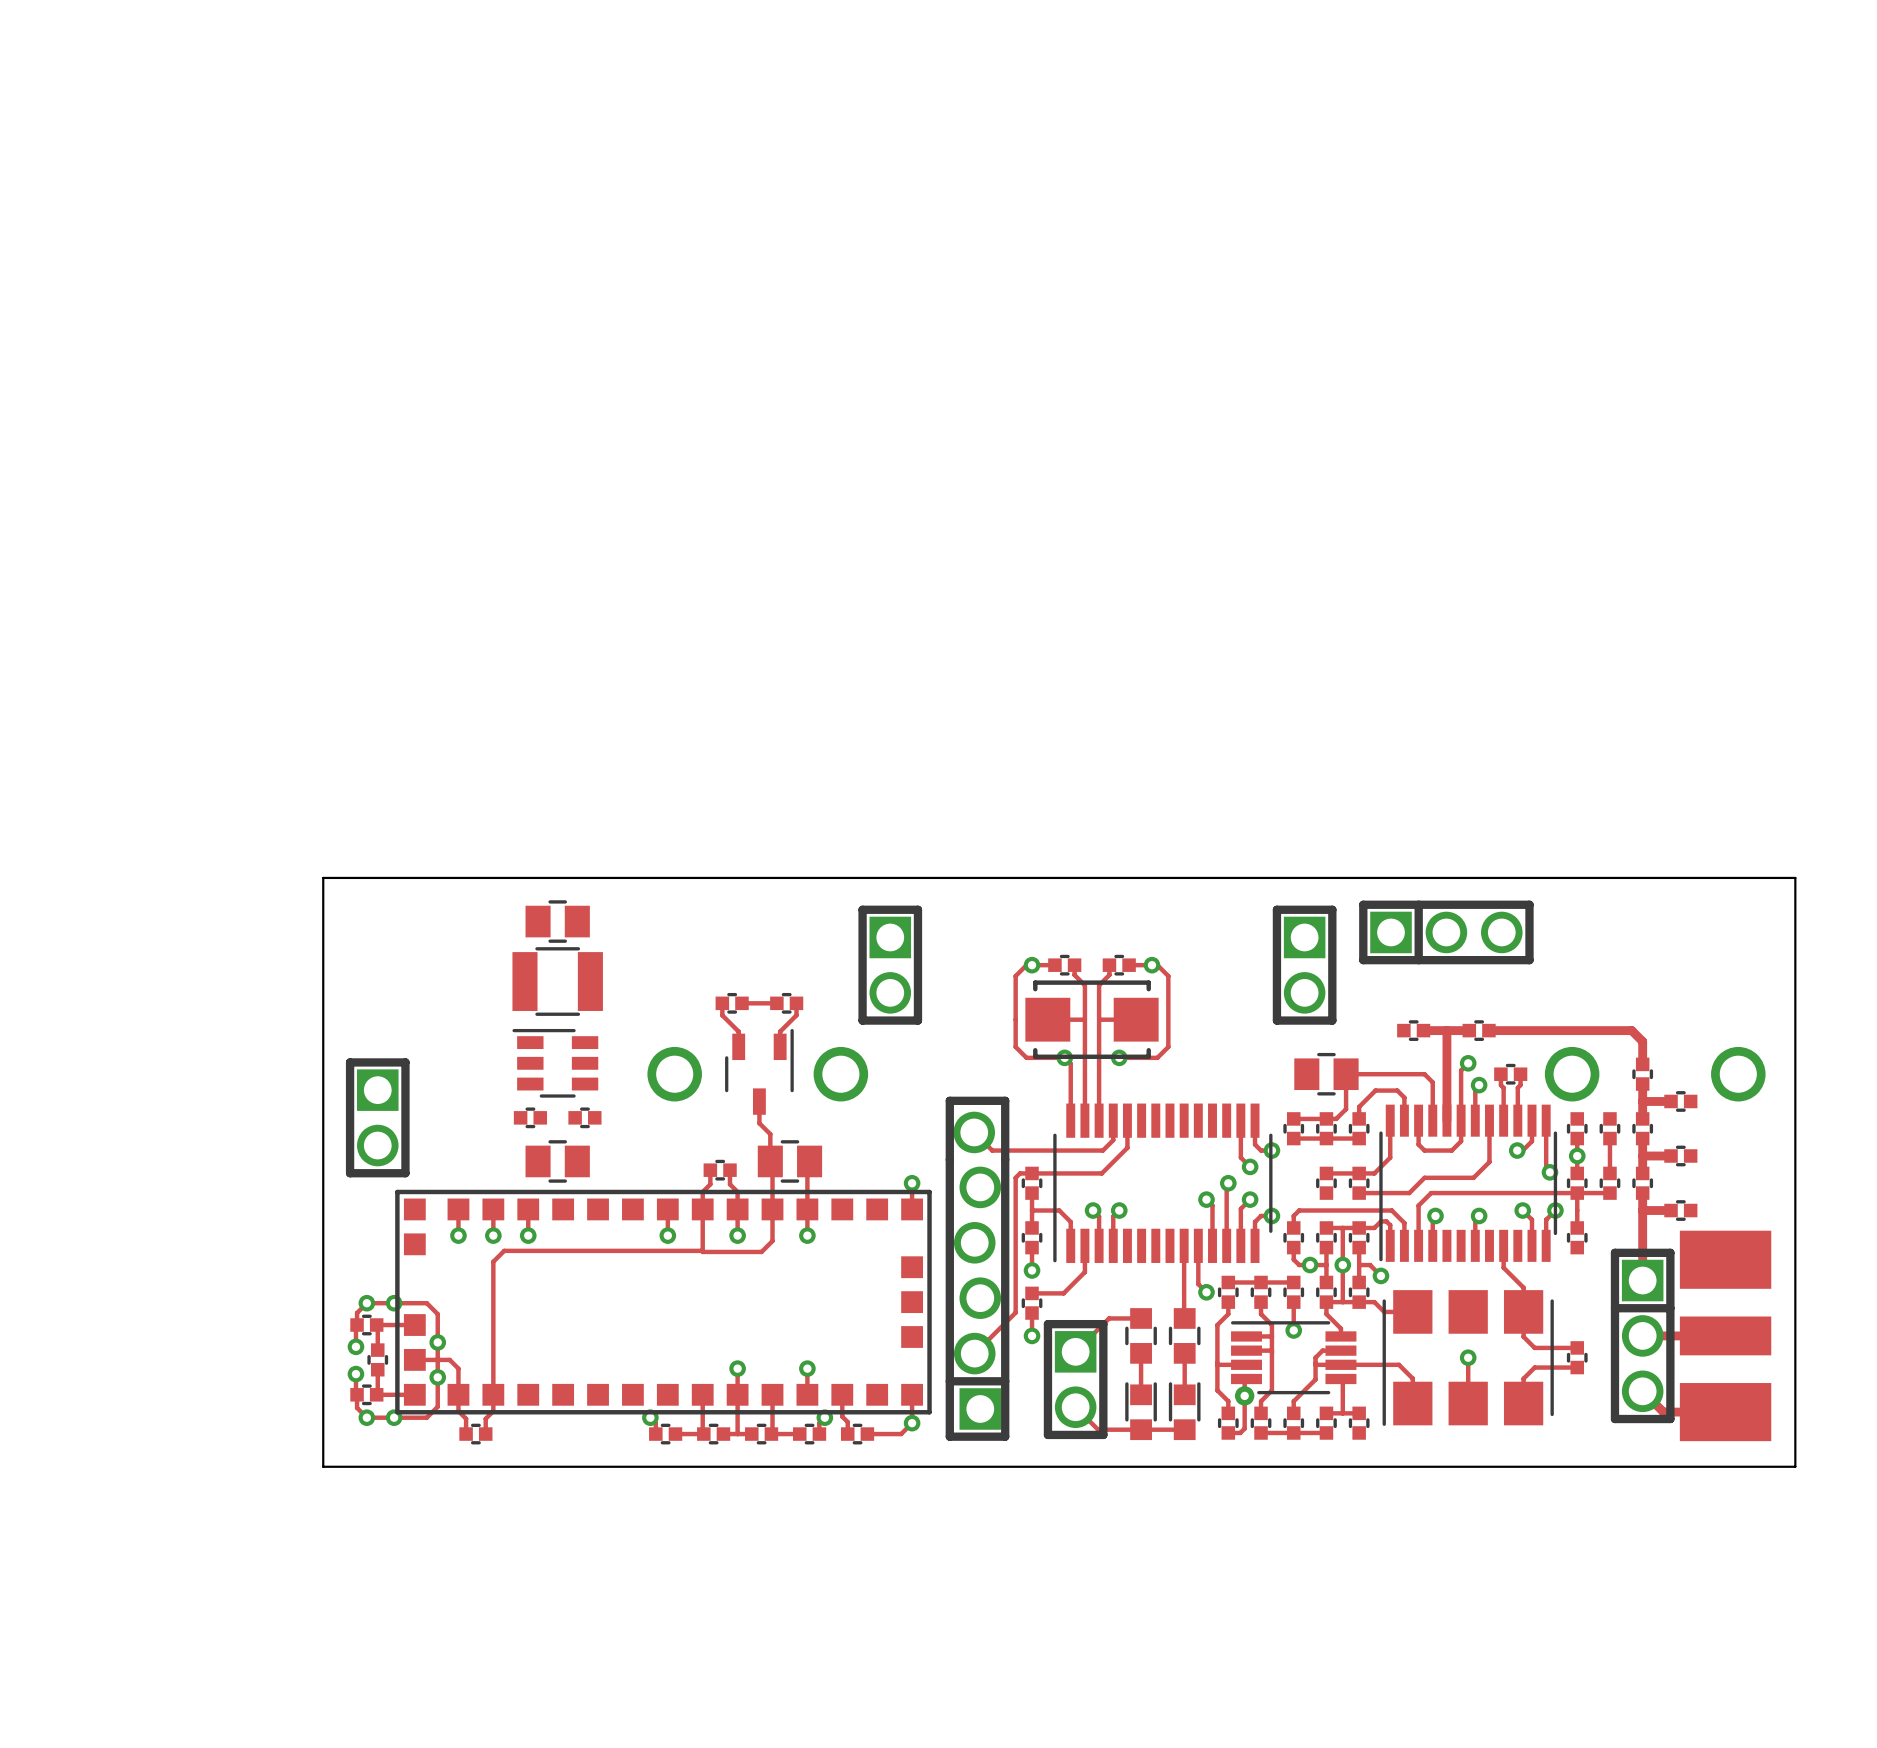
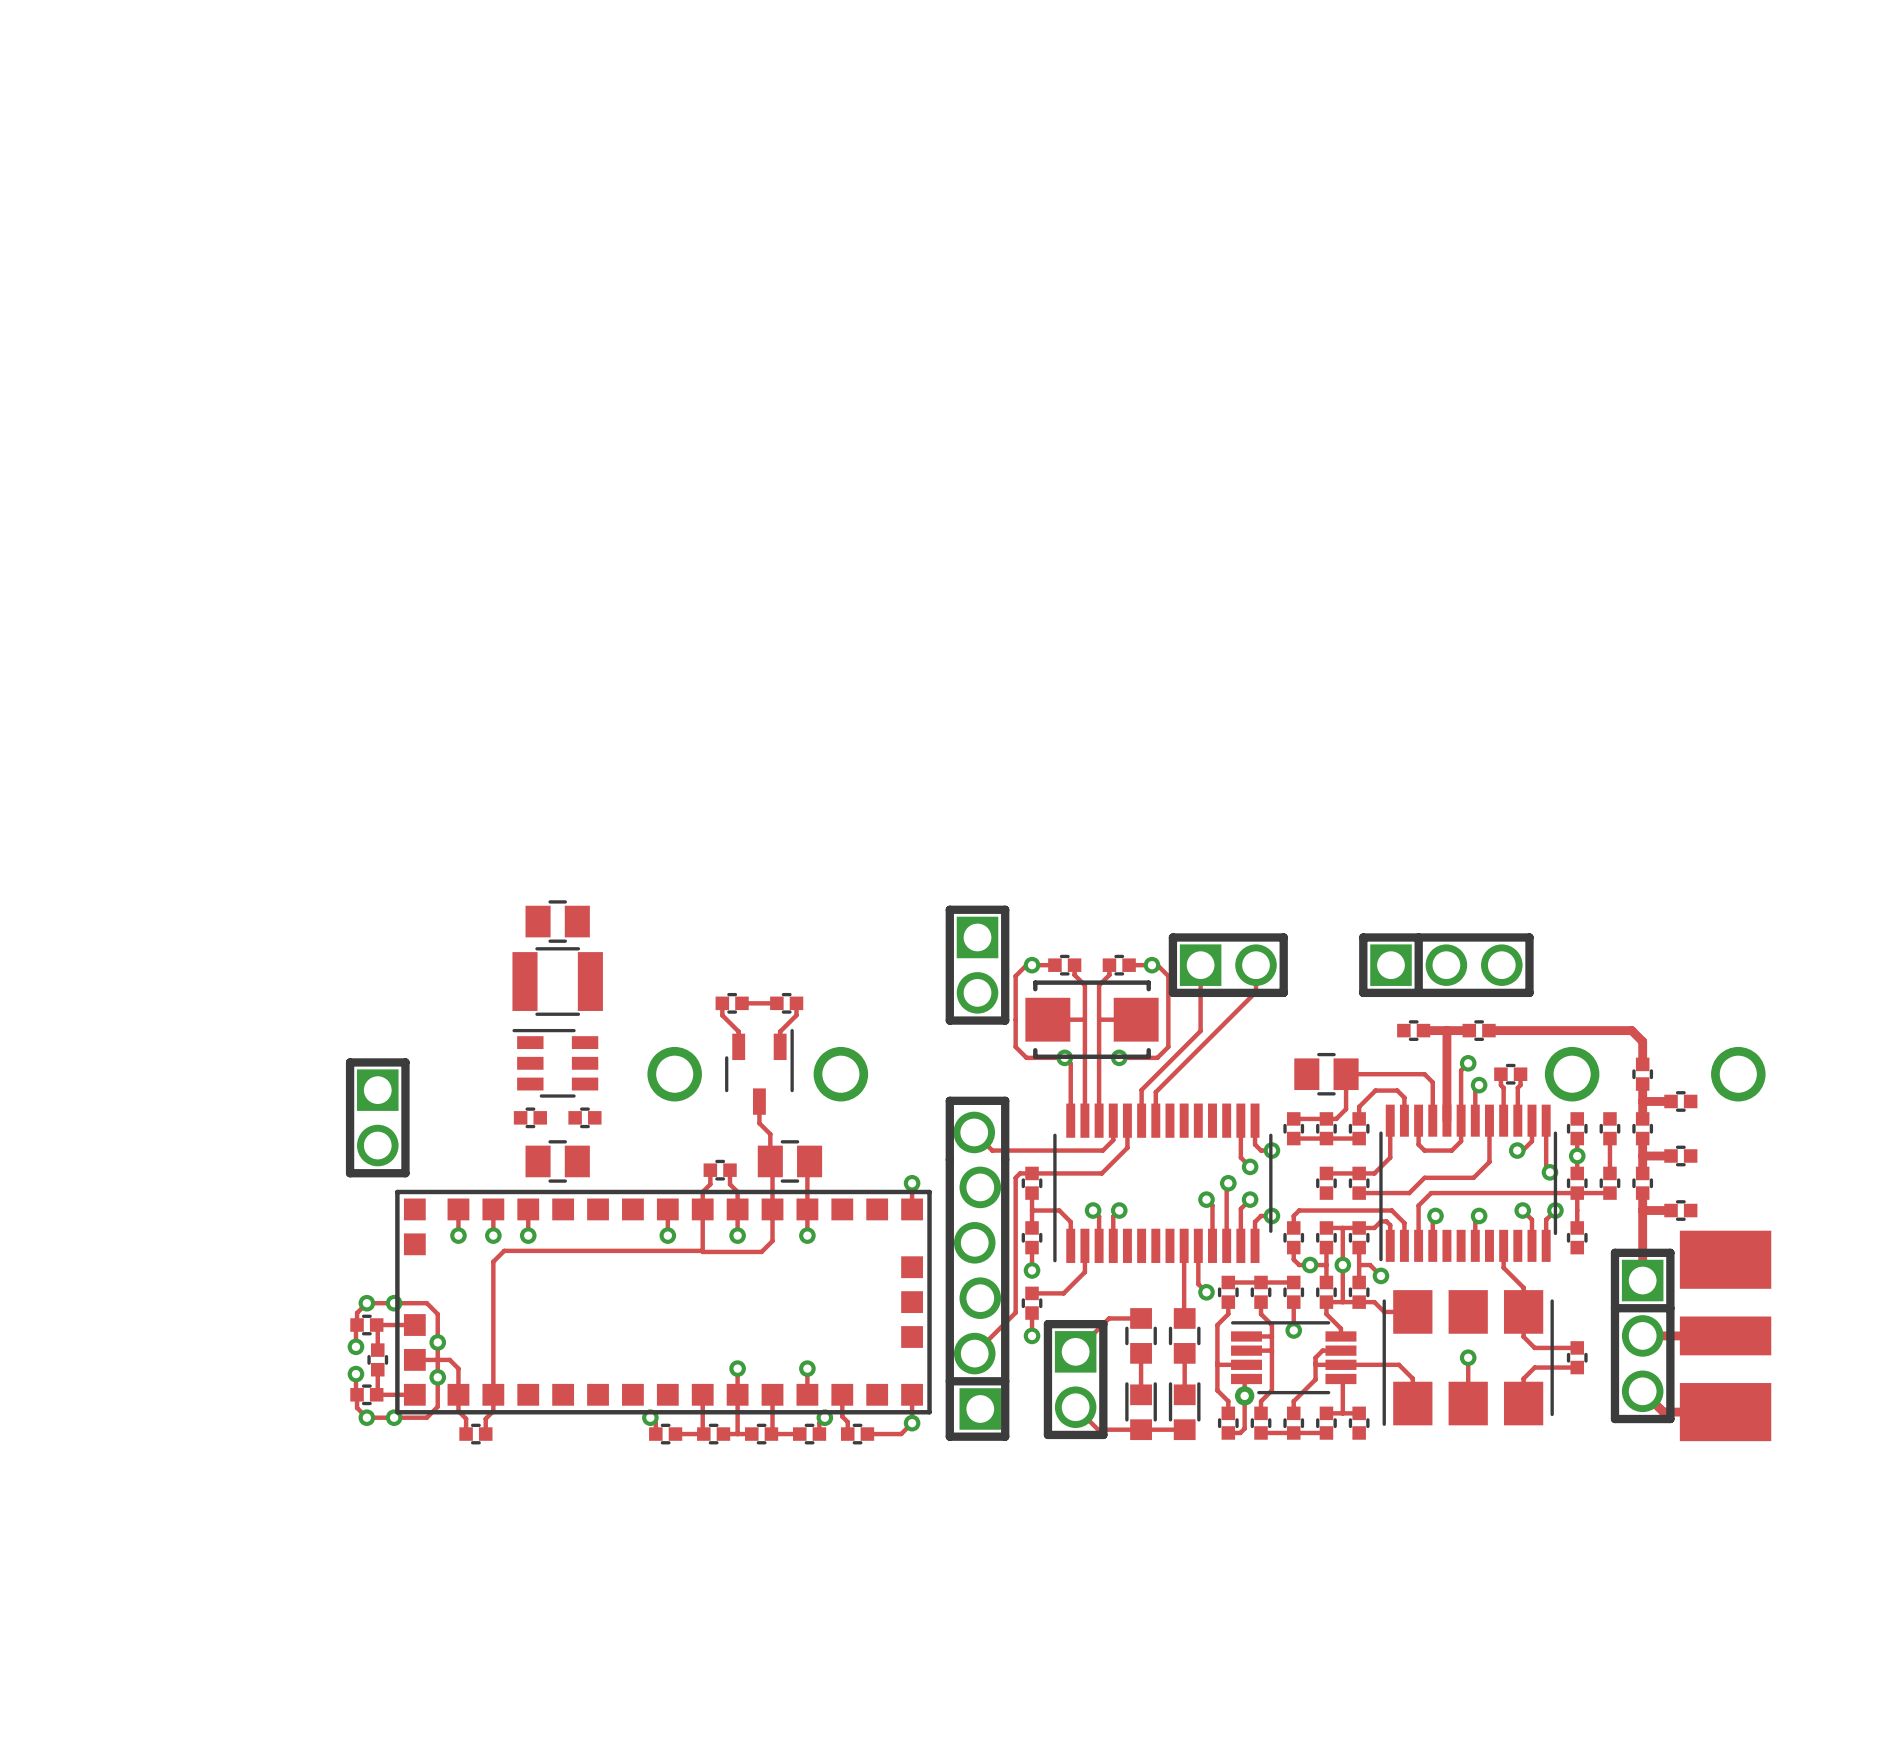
board edge: (323, 877) (1795, 877) (1795, 1466) (323, 1466) (323, 877) -> none
part position: (1446, 932) -> (1446, 965)
part position: (890, 965) -> (977, 965)
track: none -> (1200, 965) (1200, 1031) (1141, 1090) (1141, 1120)
track: none -> (1256, 965) (1256, 992) (1155, 1092) (1155, 1120)
part rotation: 0° (1304, 965) -> 90° counterclockwise (1228, 965)
part position: (1304, 965) -> (1228, 965)

